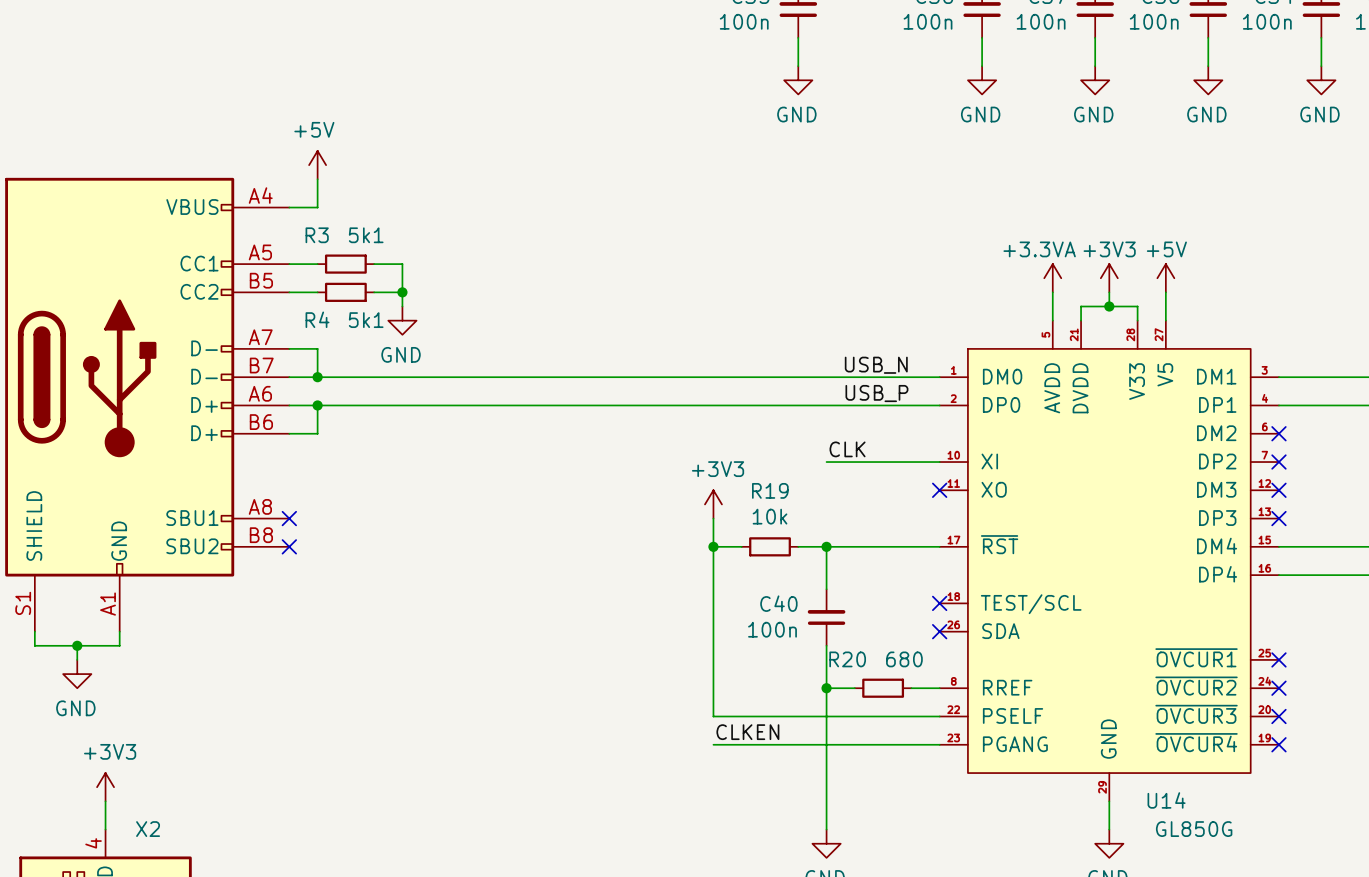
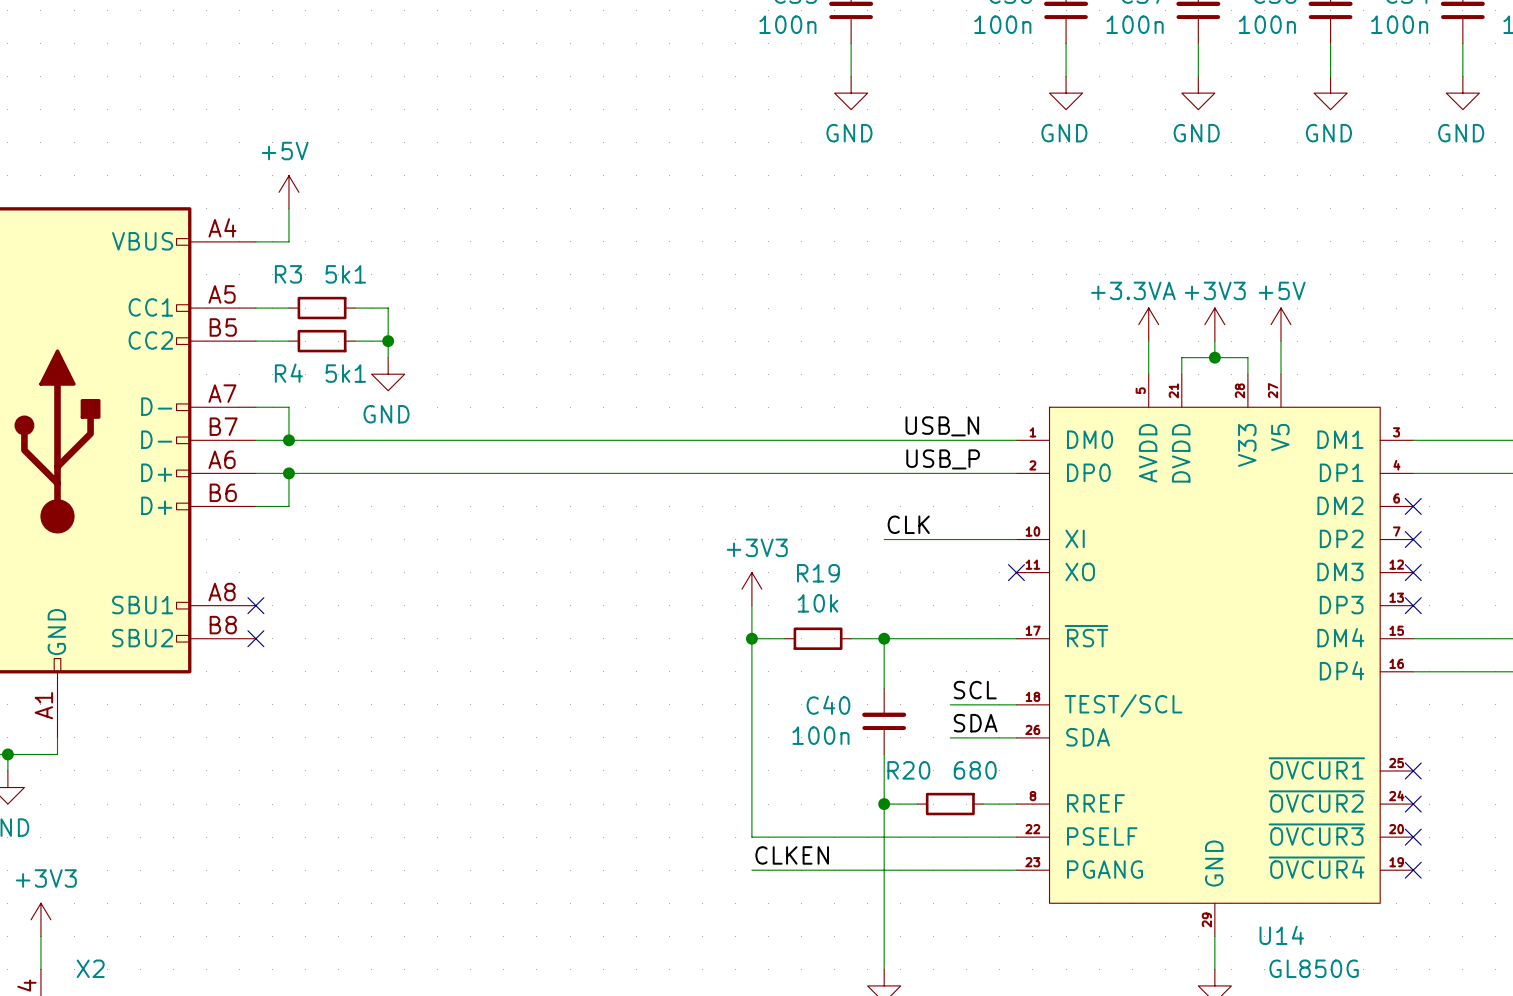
label: none -> SCL (975, 690)
wire: none -> (950, 704) (1016, 704)
no-connect mark: (939, 603) -> none
label: none -> SDA (975, 723)
wire: none -> (950, 737) (1016, 737)
no-connect mark: (939, 631) -> none

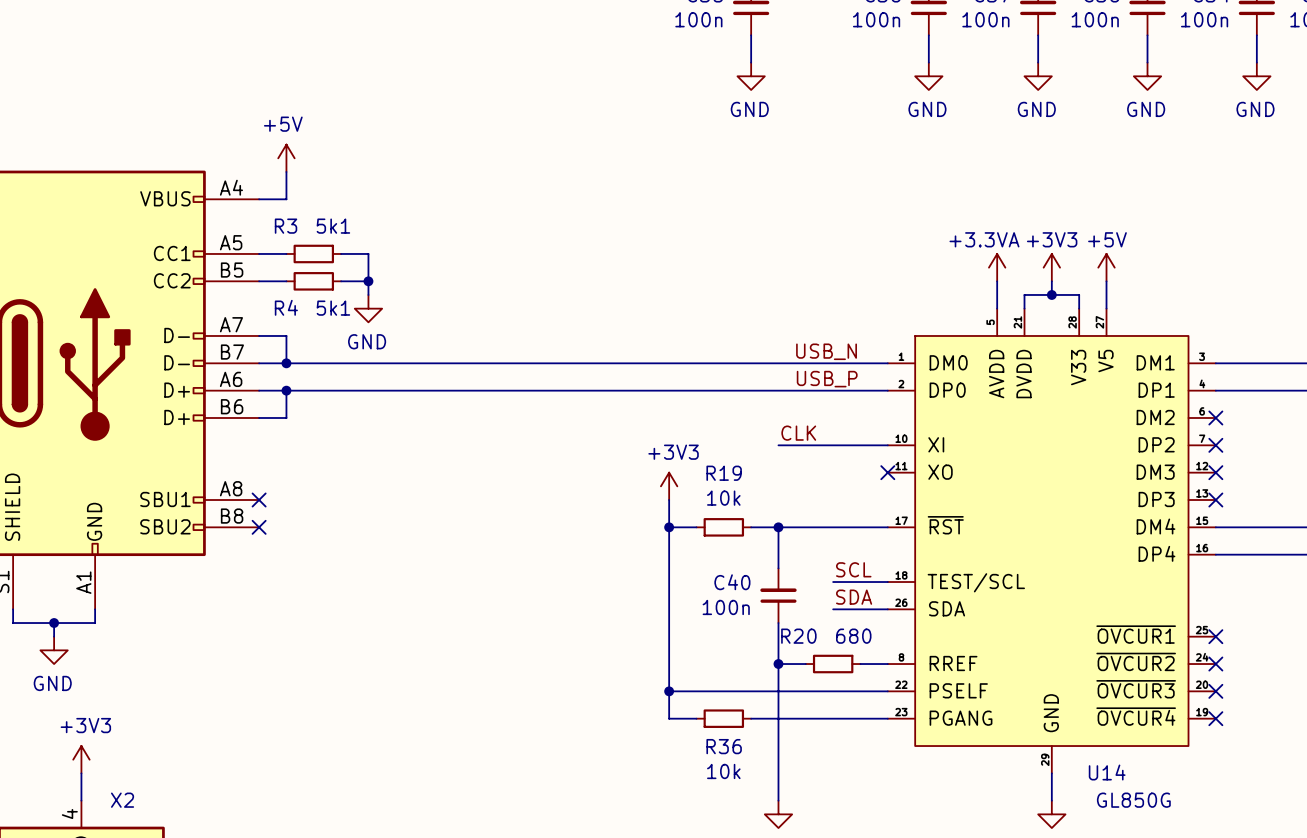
wire: none -> (669, 691) (669, 718)
junction: none -> (669, 691)
label: CLKEN (792, 855) -> none
wire: (784, 870) (851, 870) -> none
R36: none -> 10k (723, 718)

